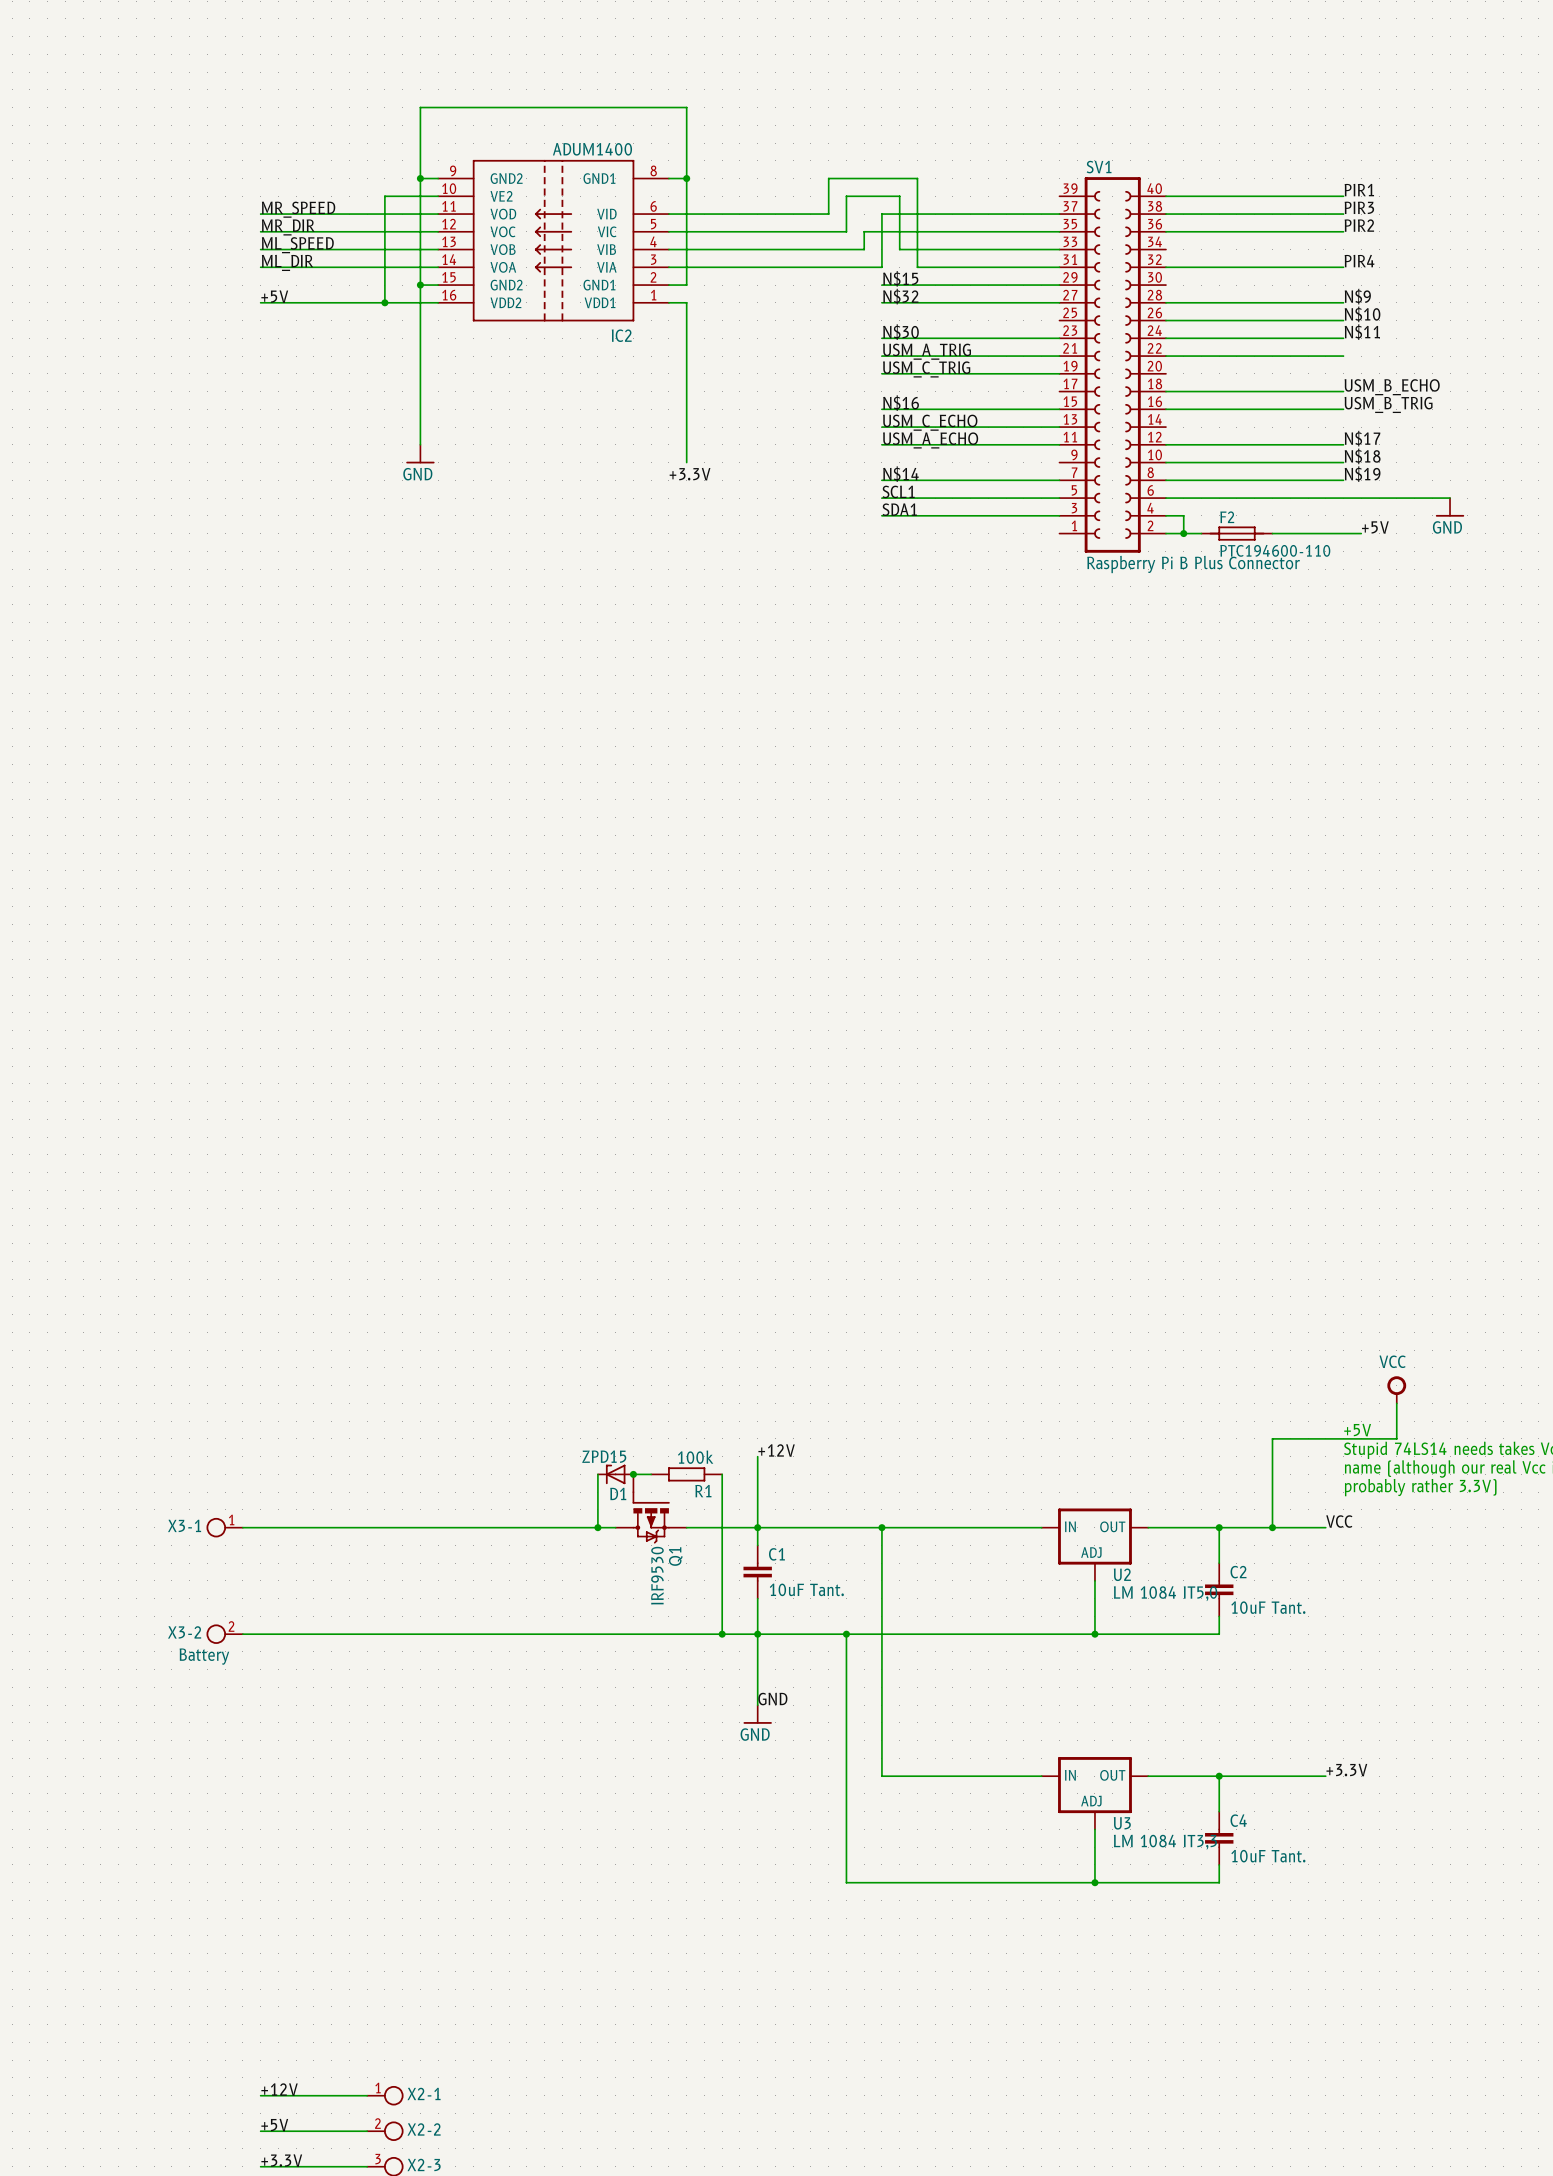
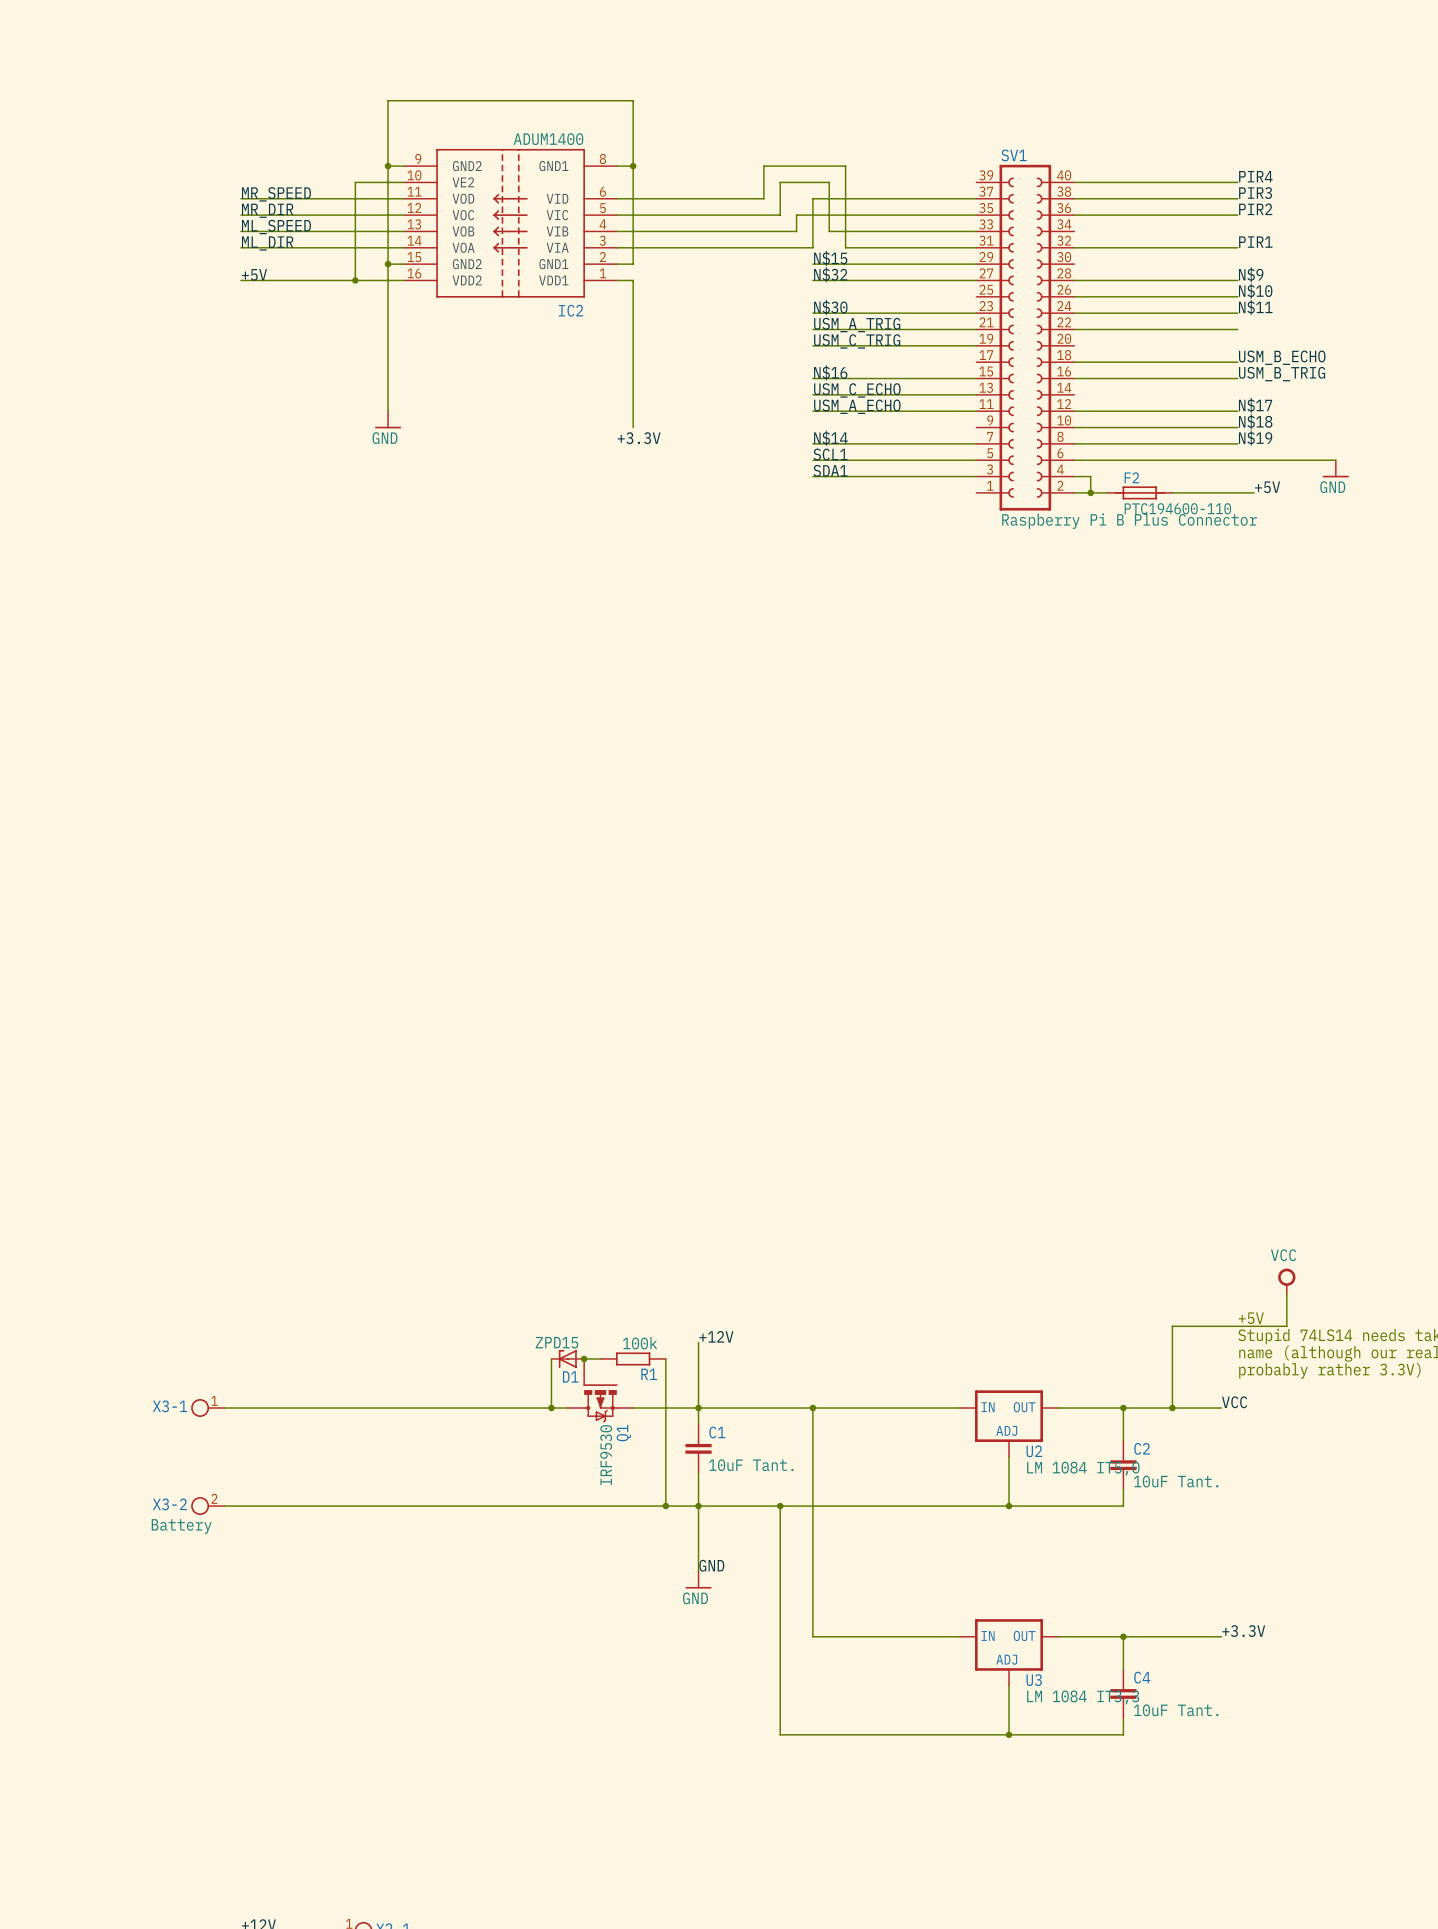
label: PIR1 (1359, 190) -> PIR4 (1255, 176)
label: PIR4 (1359, 261) -> PIR1 (1255, 242)

